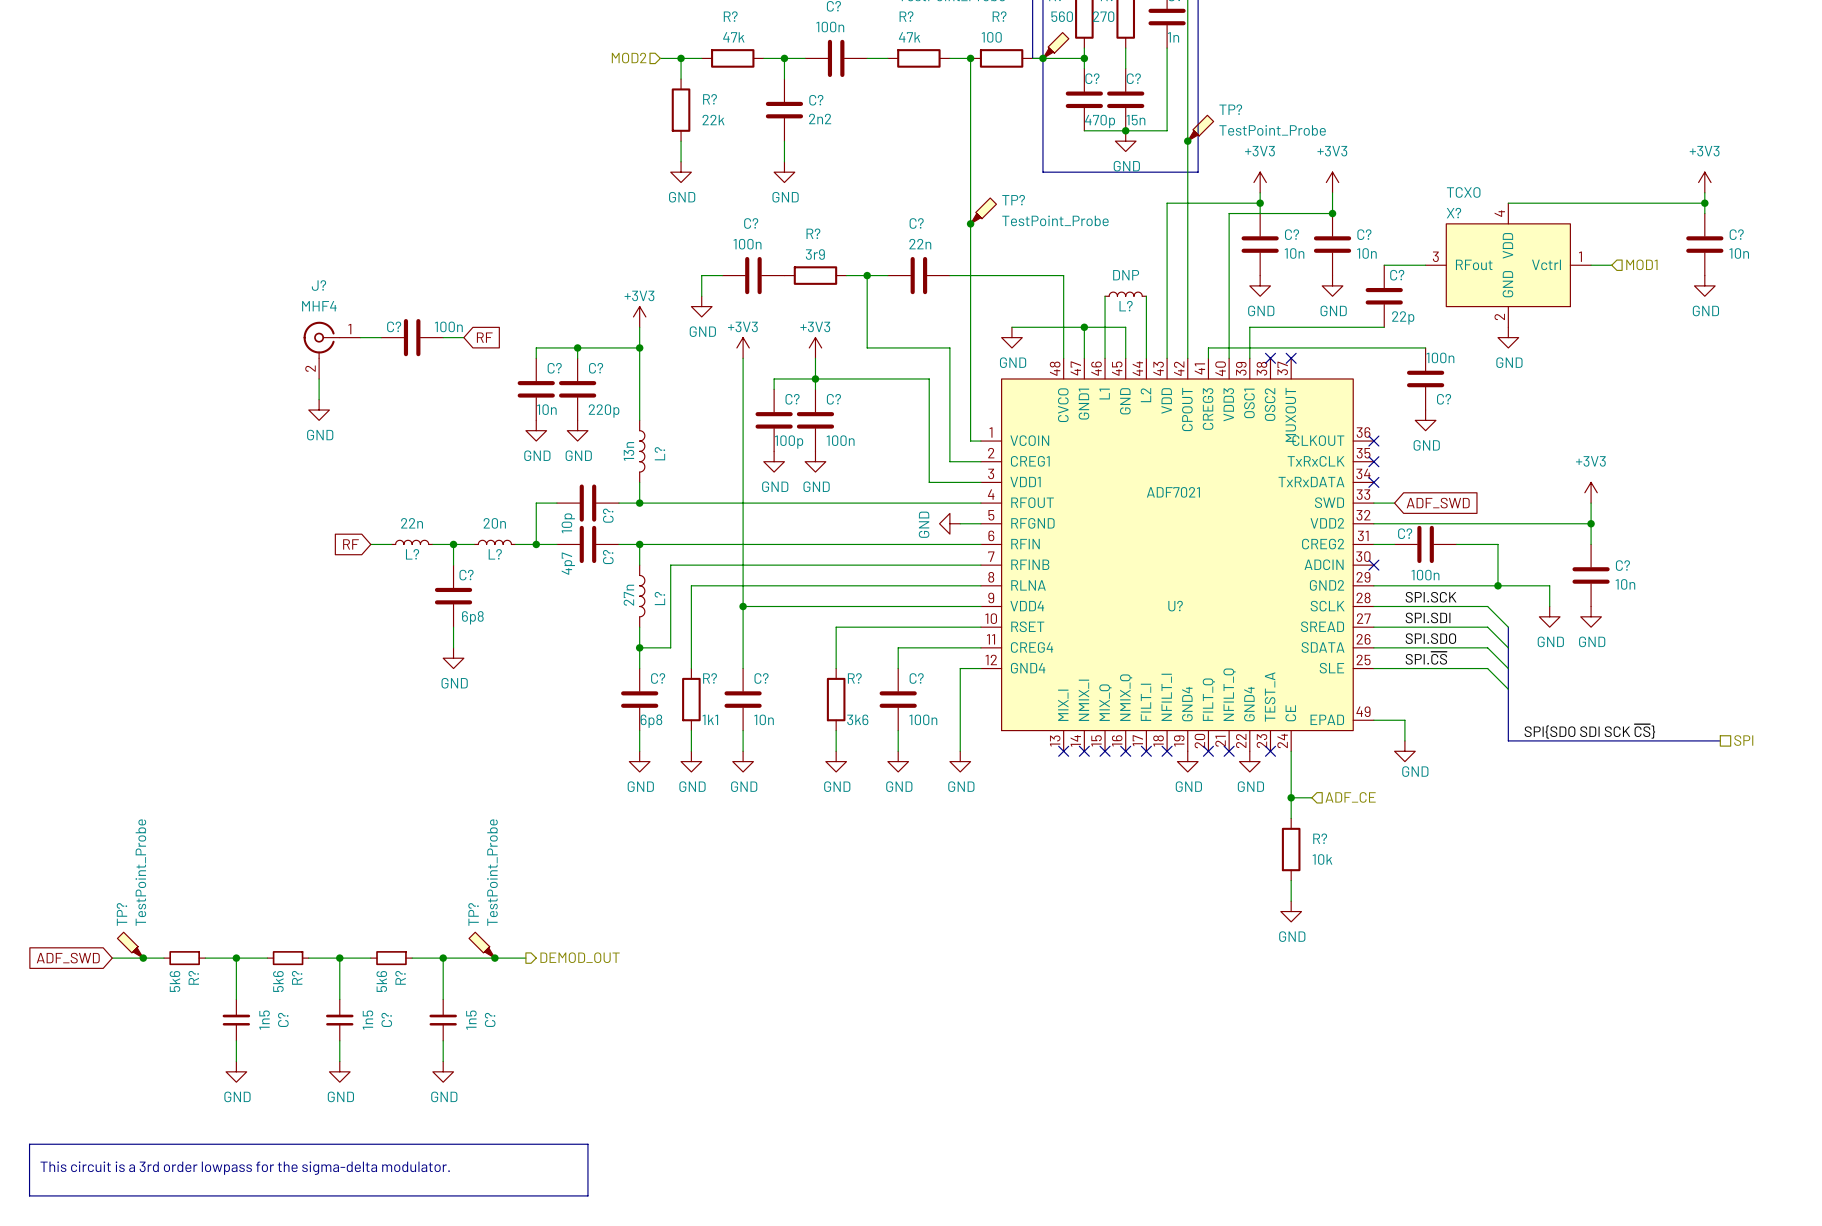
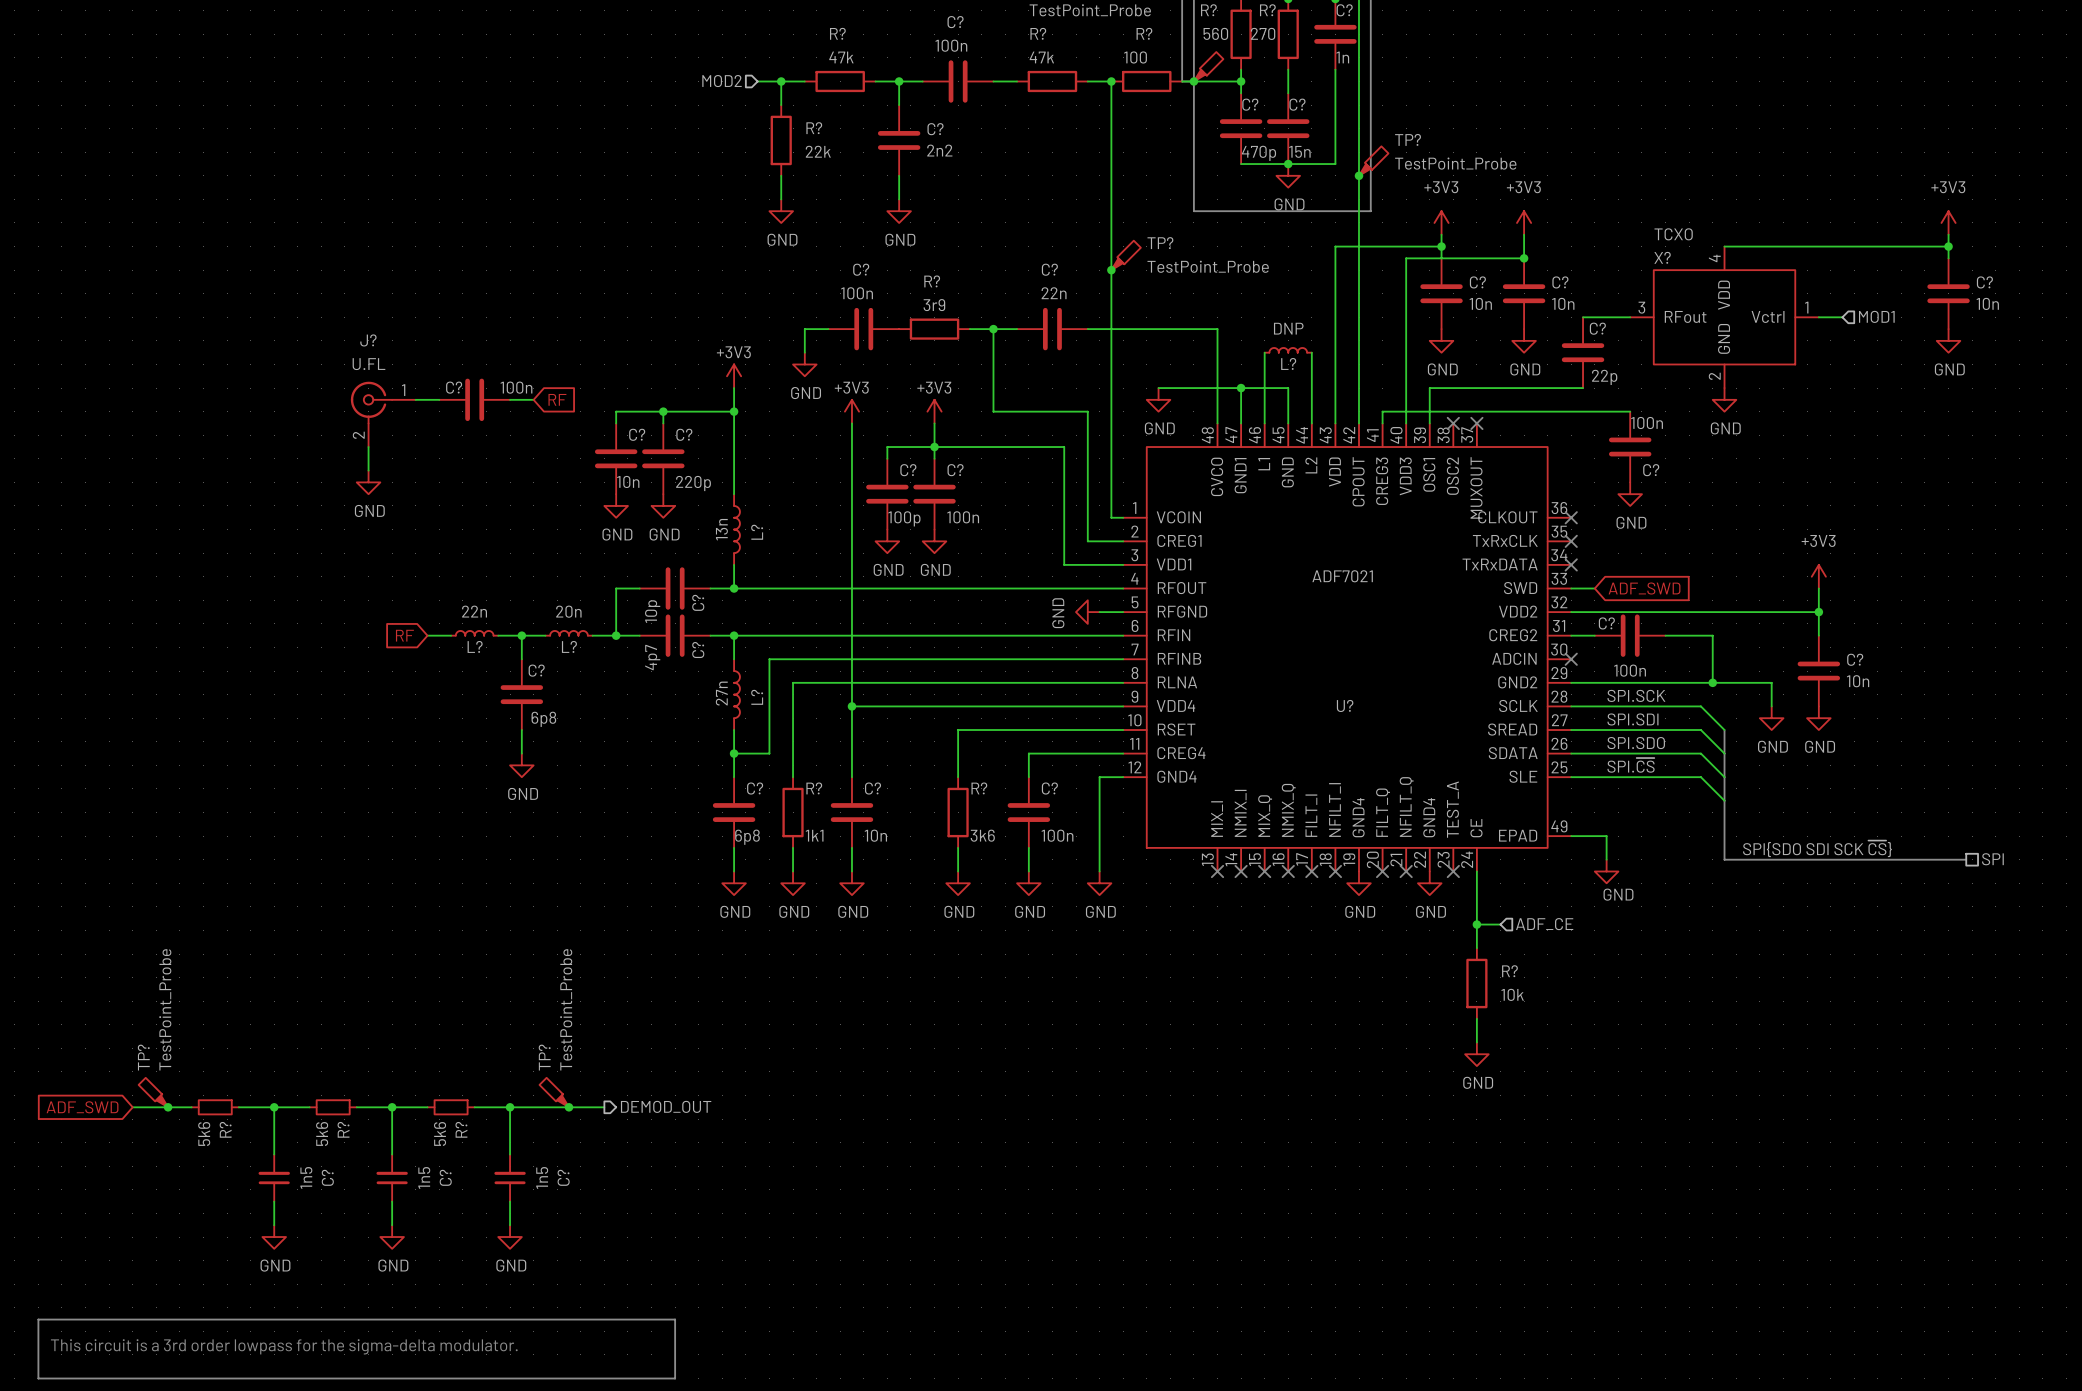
J? value: MHF4 (319, 306) -> U.FL (368, 364)

